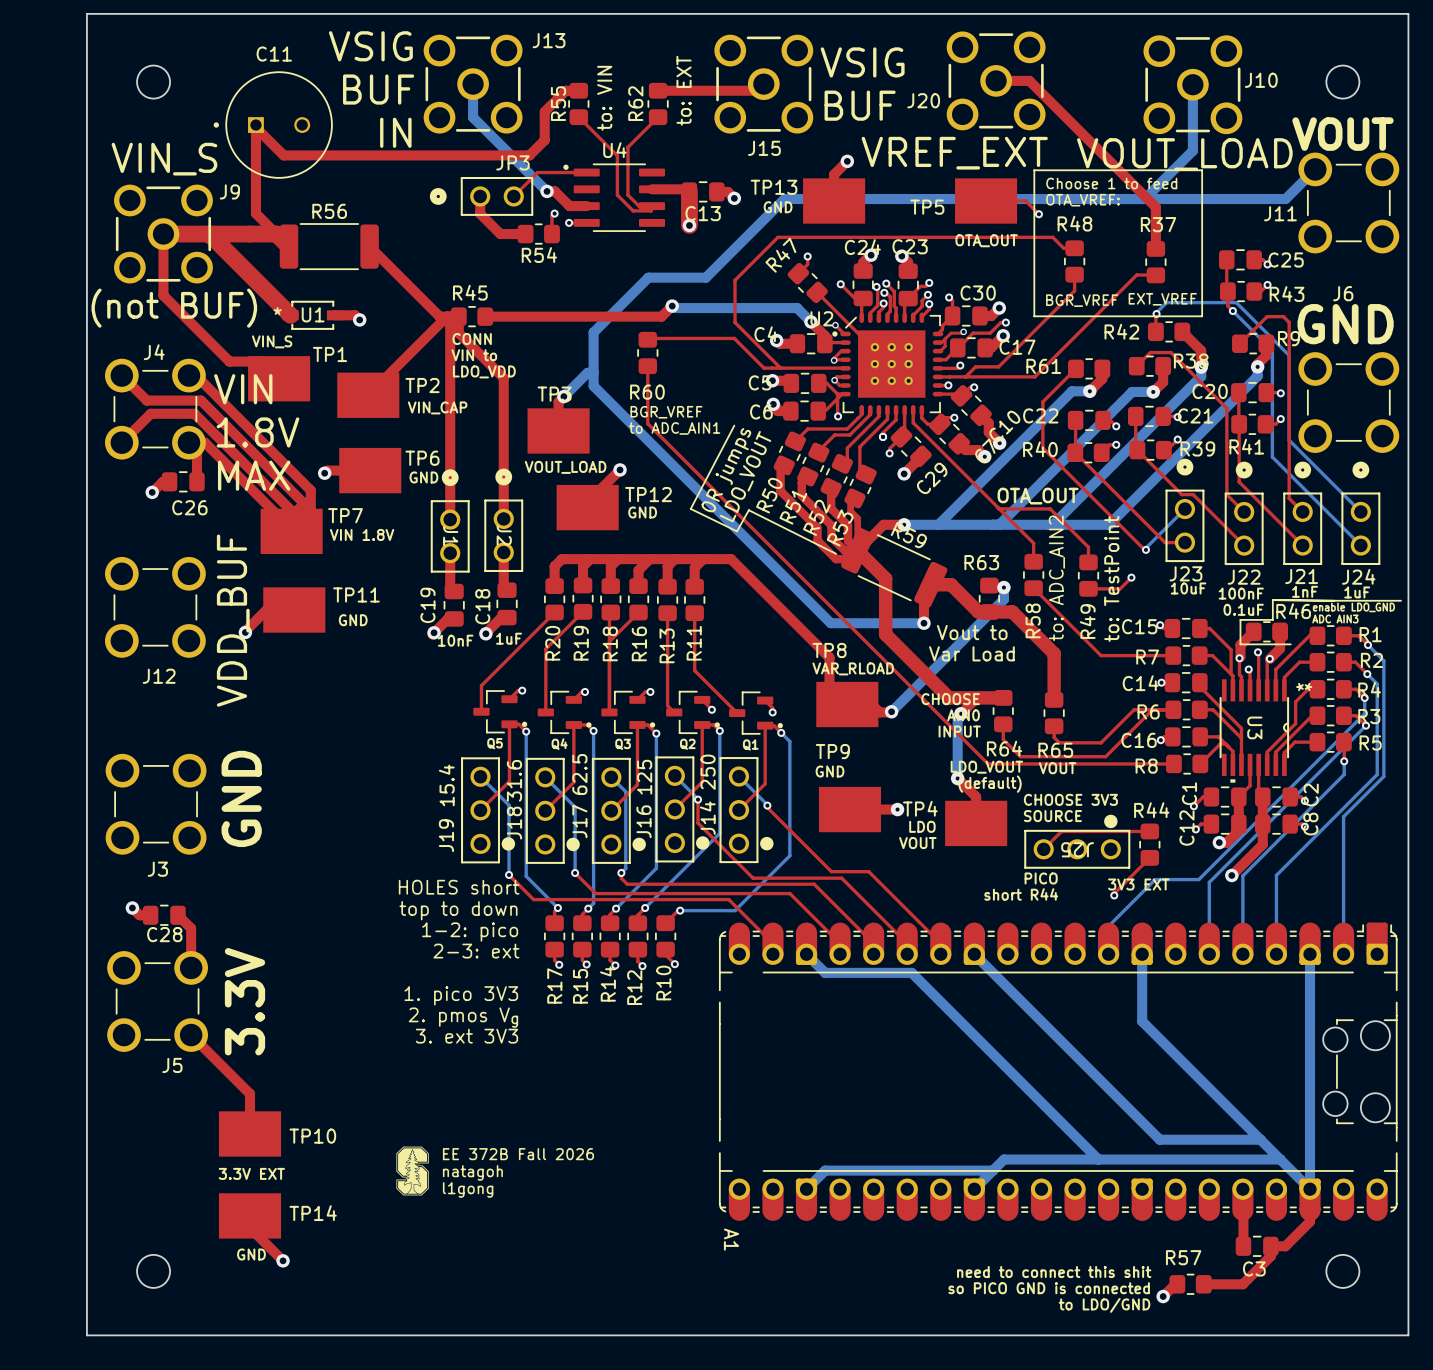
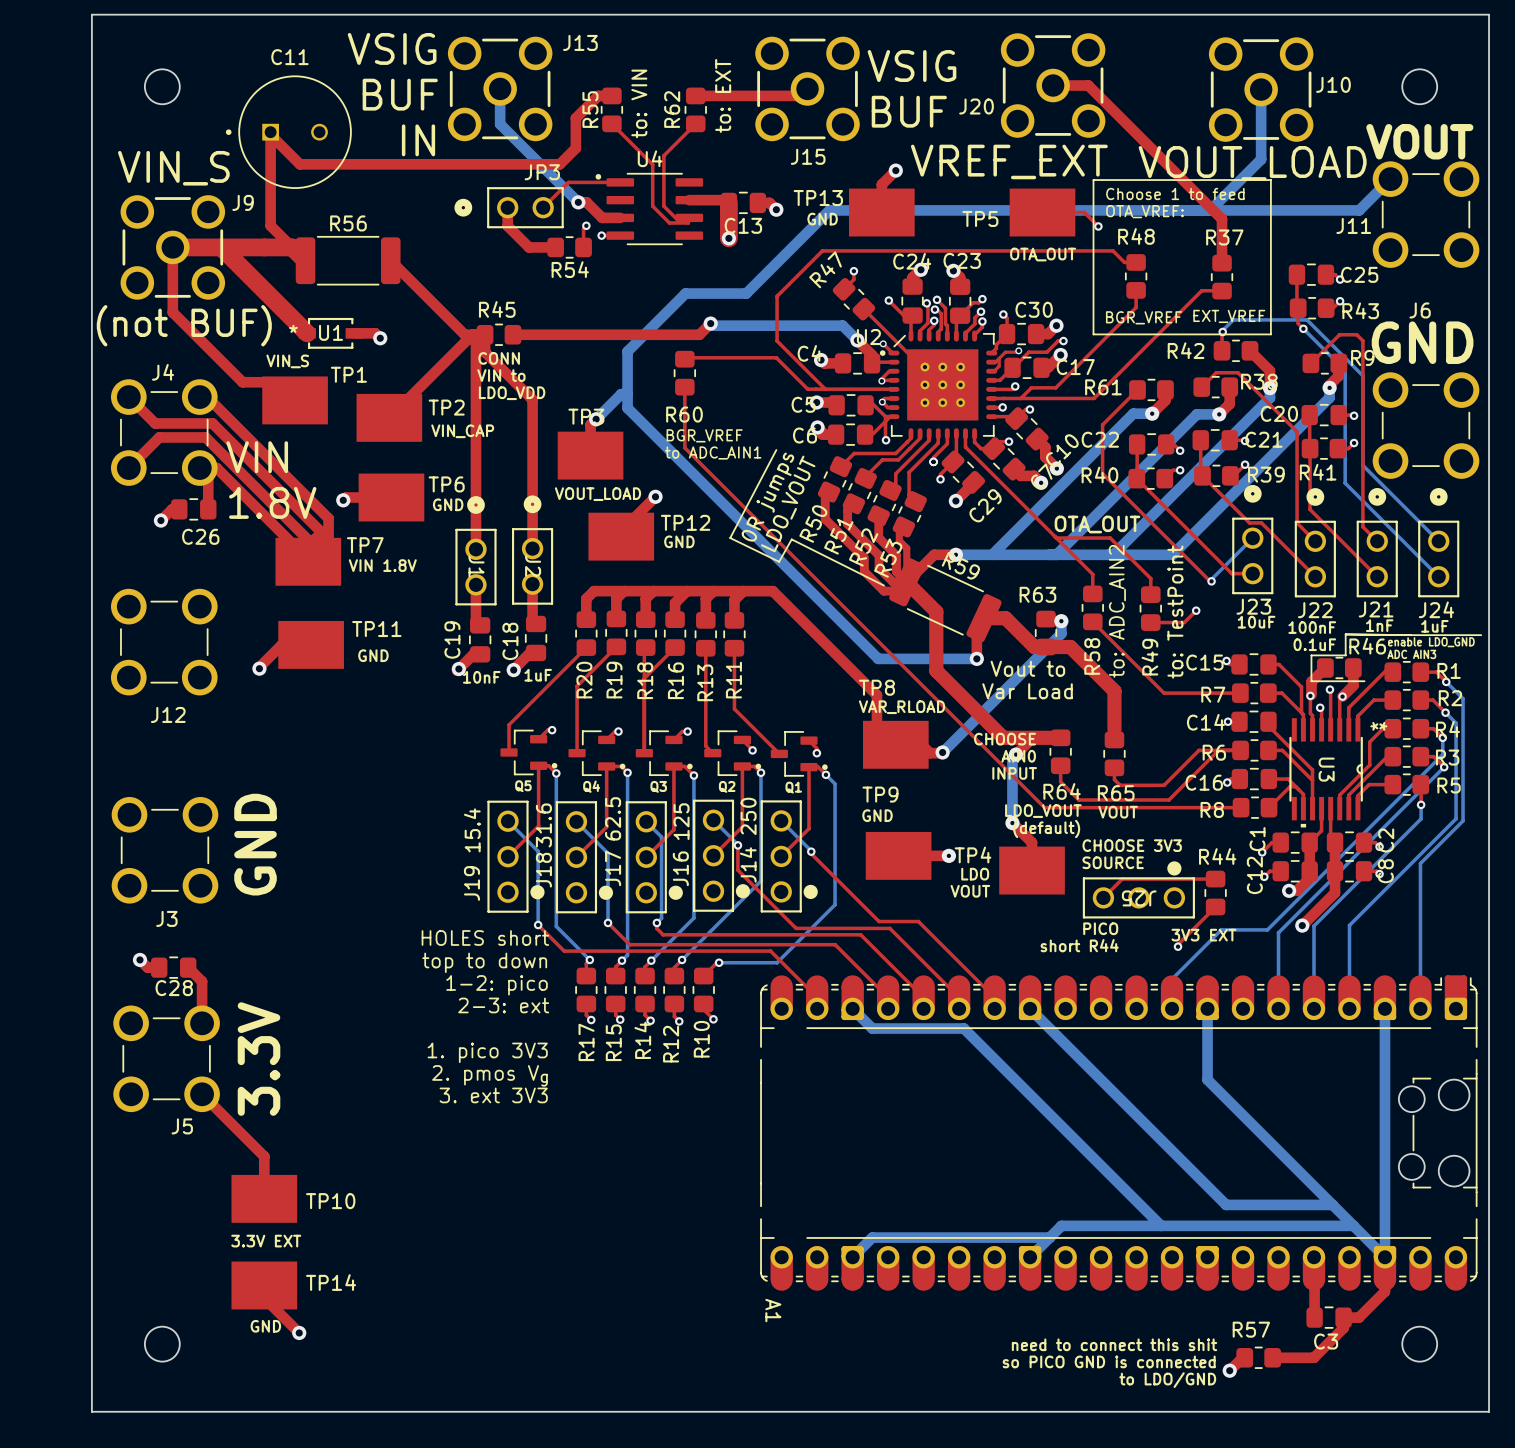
text: VIN (243, 389) -> none
text: 1.8V (258, 432) -> VIN (257, 457)
text: MAX (254, 475) -> 1.8V (272, 502)
text: VDD_BUF (233, 620) -> none
drawing: [396, 1146, 429, 1196] -> none
text: EE 372B Fall 2026 (518, 1154) -> none
text: natagoh (472, 1172) -> none
text: l1gong (468, 1189) -> none

